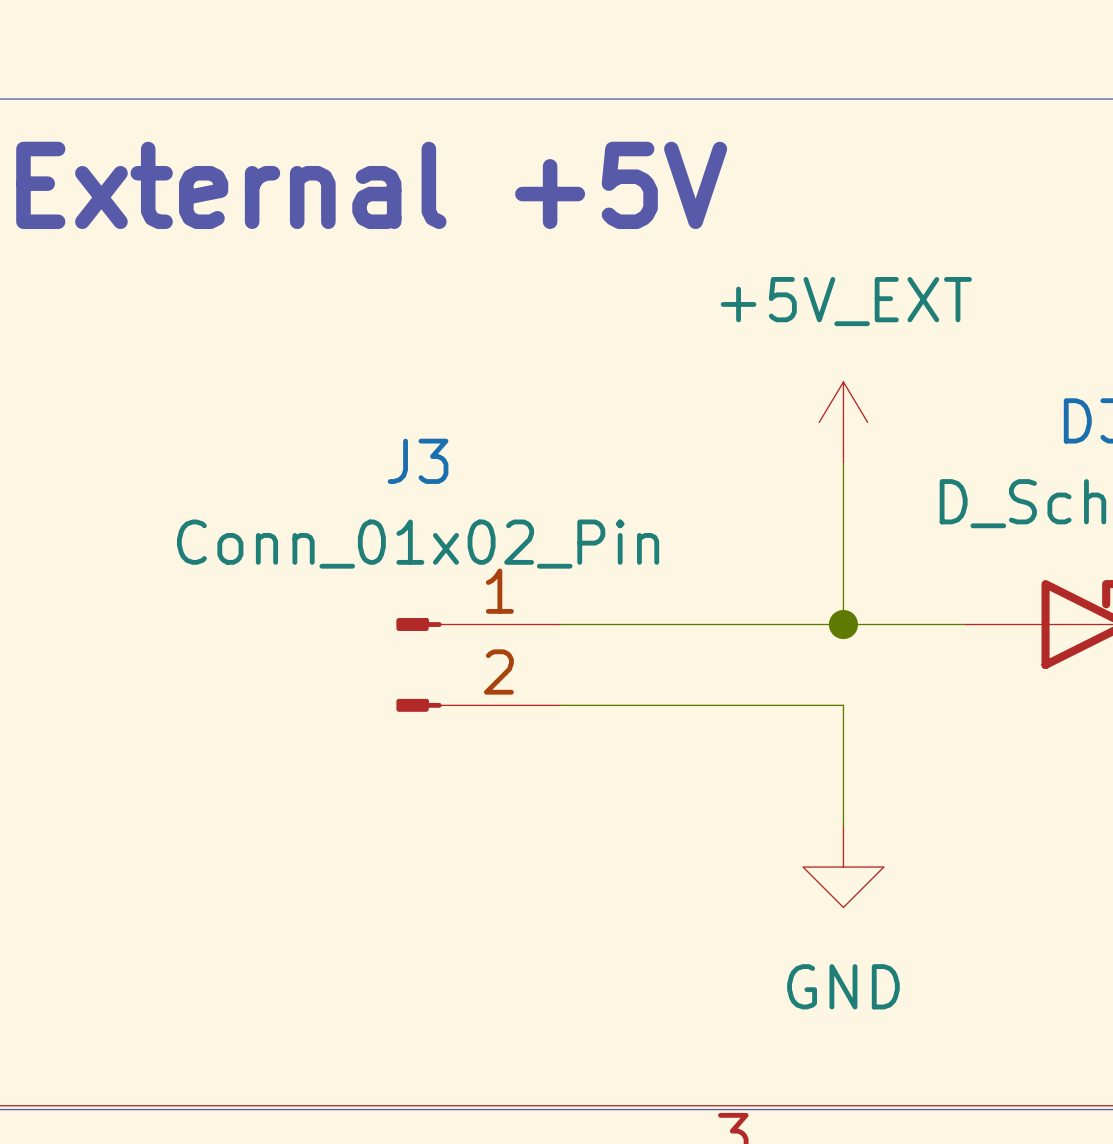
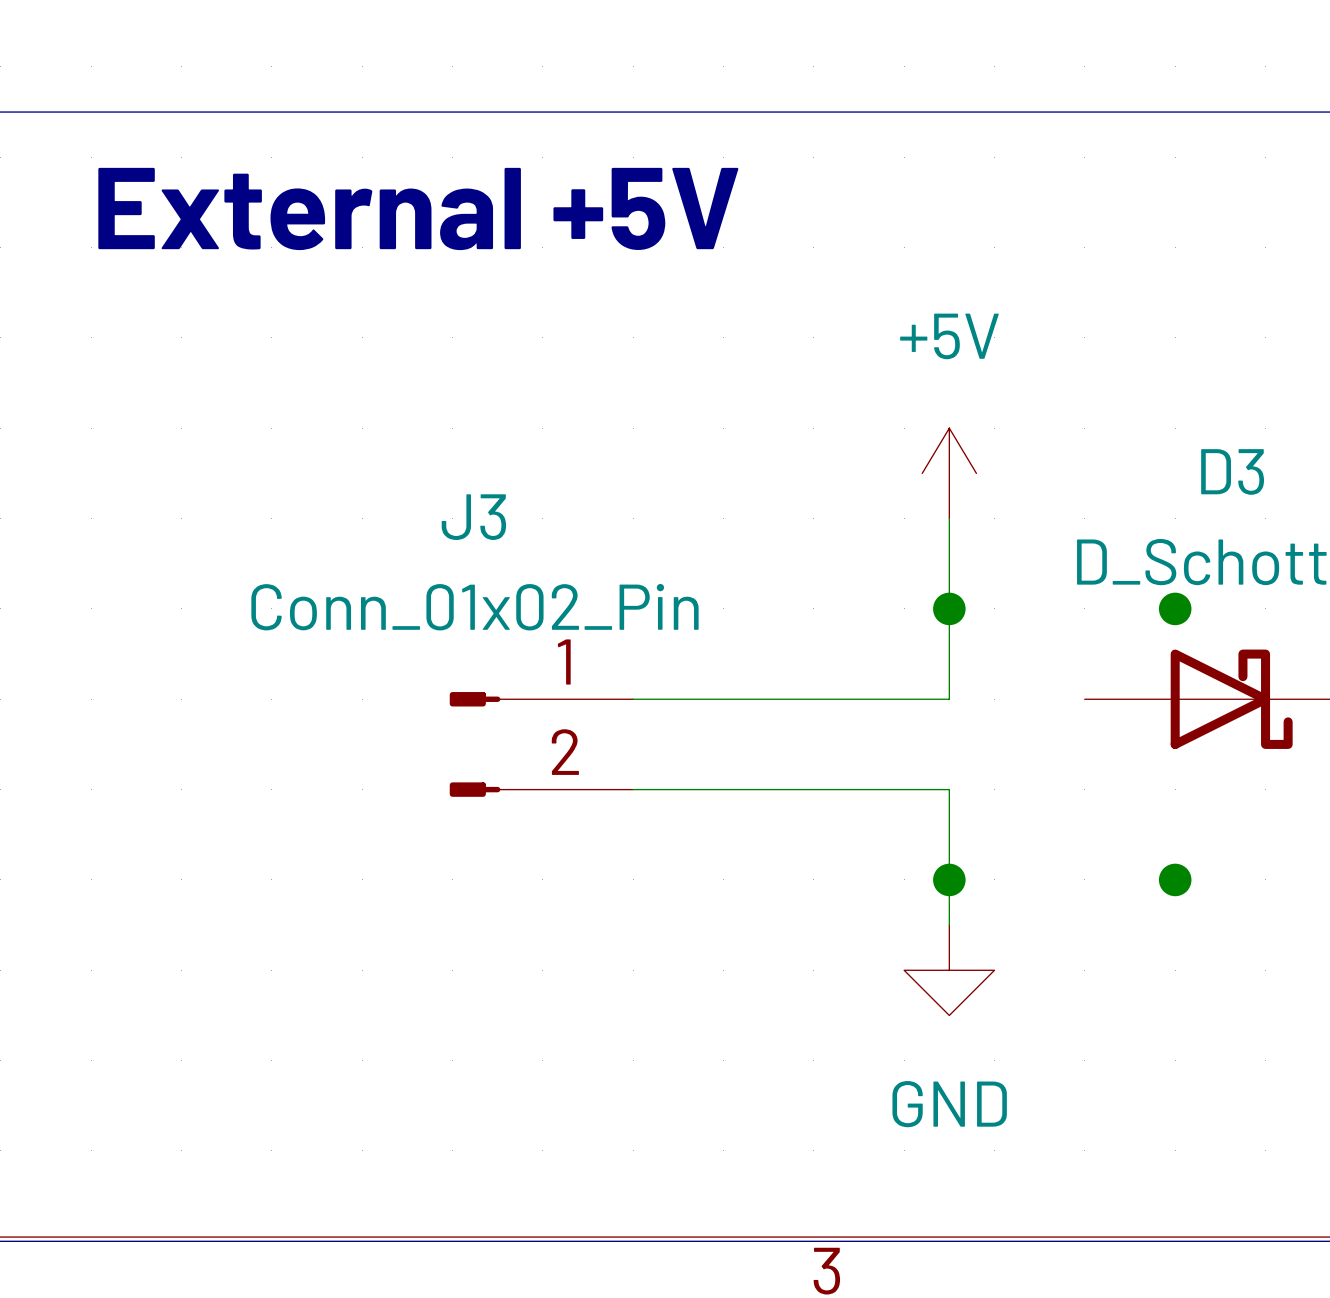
power symbol: +5V_EXT (843, 422) -> +5V (949, 473)
junction: none -> (949, 608)
junction: none -> (1175, 608)
wire: (843, 624) (964, 624) -> none
junction: (843, 624) -> none
junction: none -> (949, 879)
junction: none -> (1175, 879)

